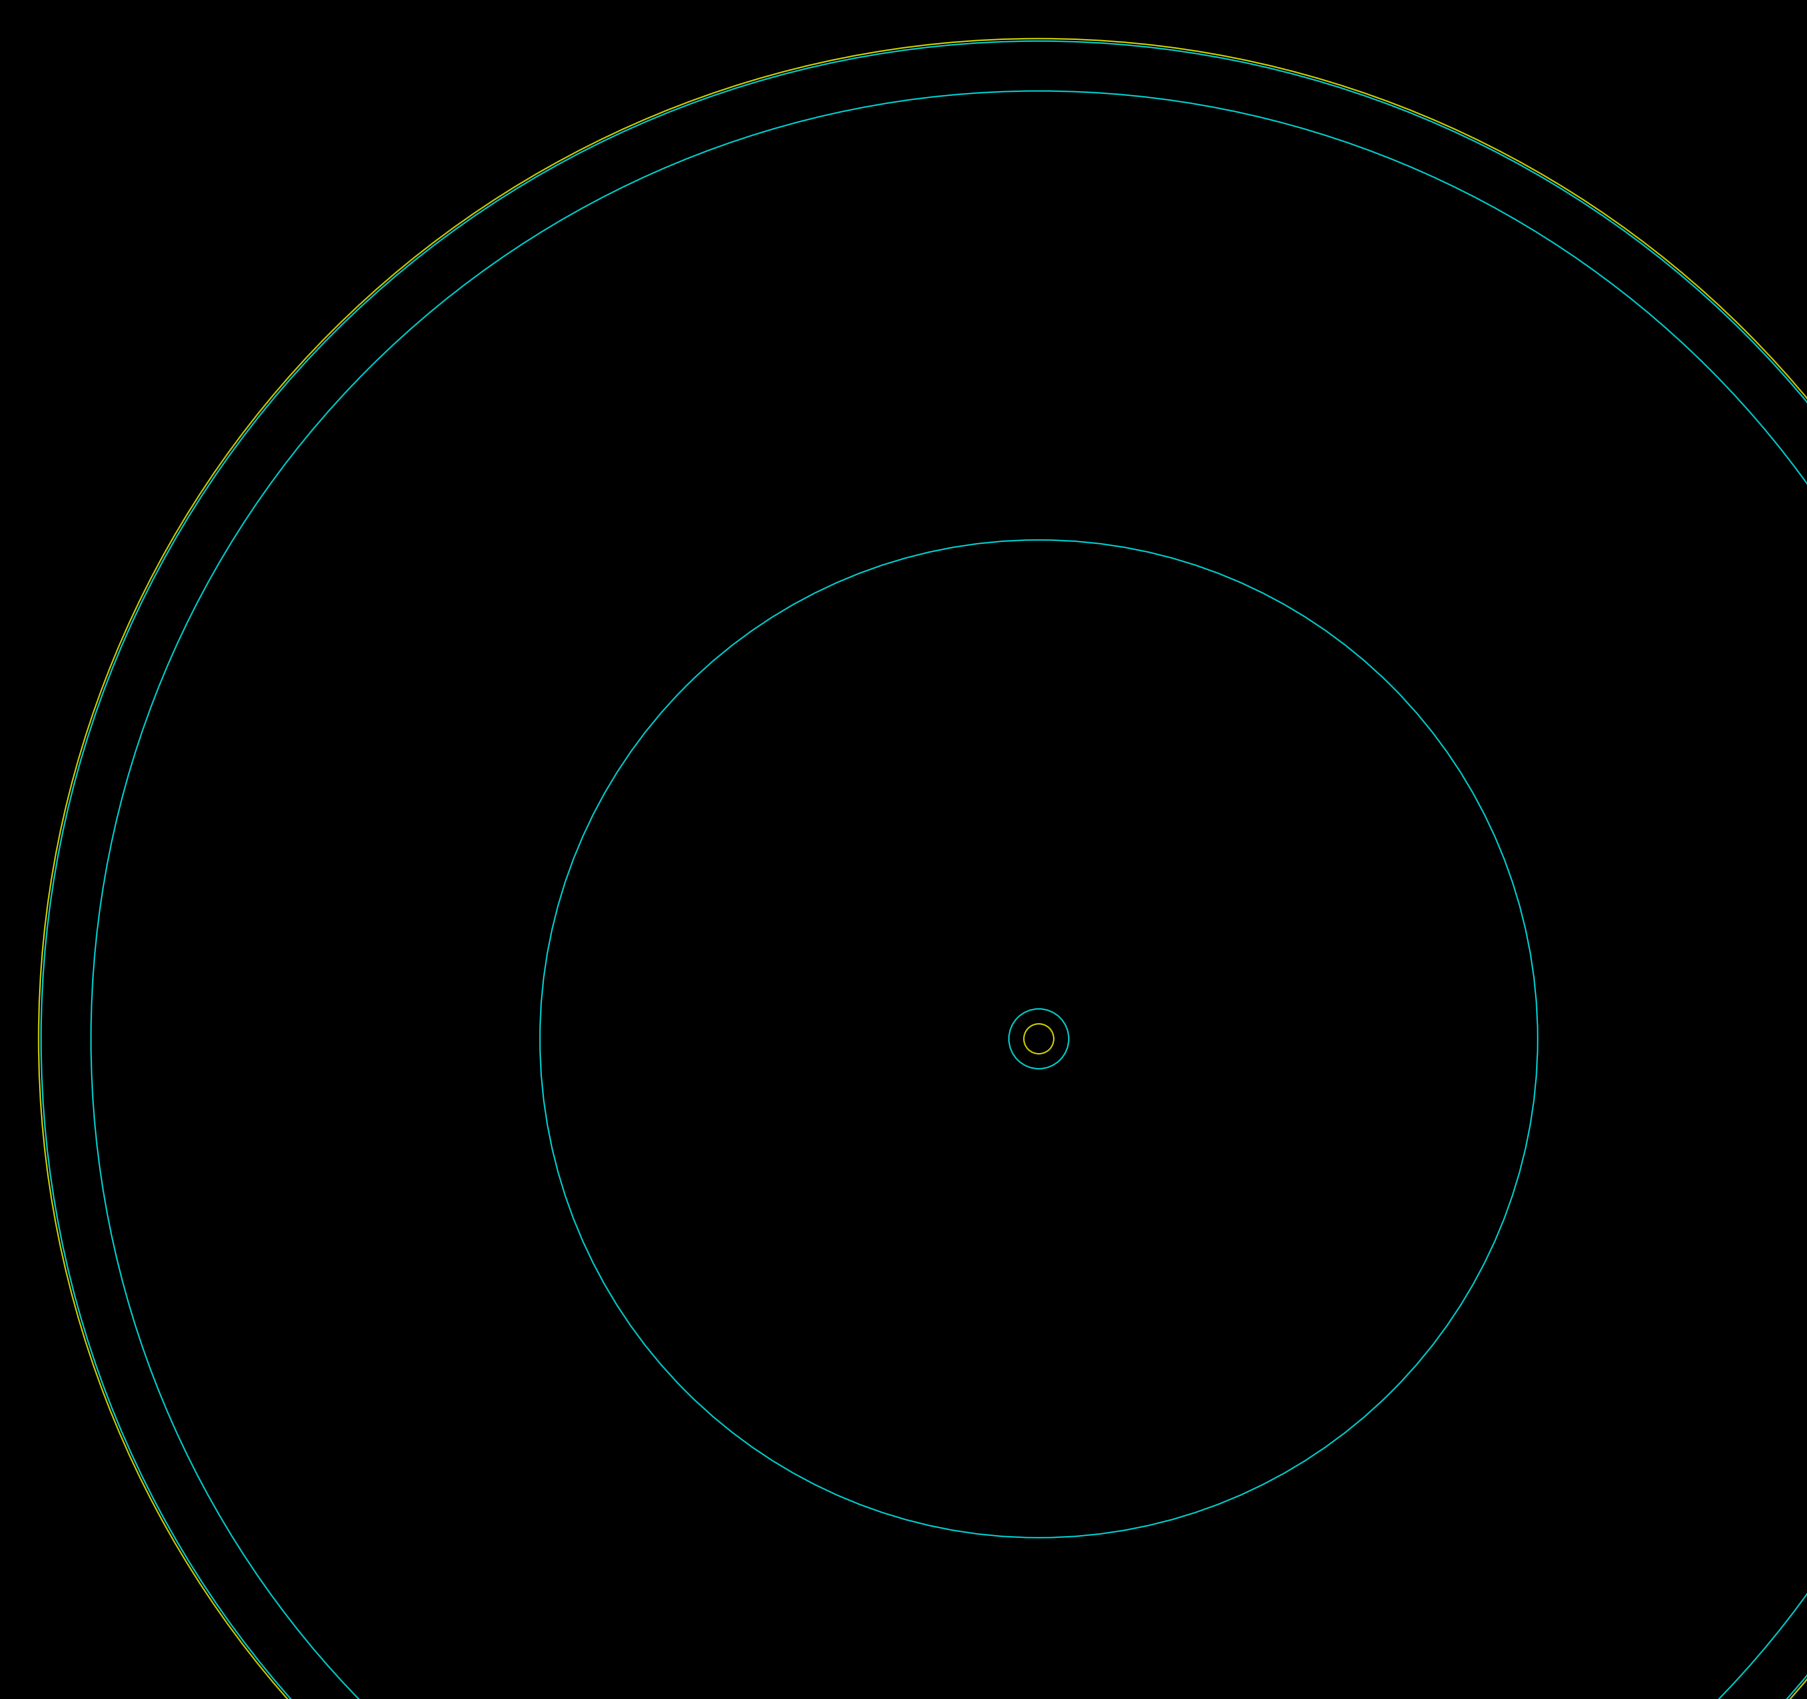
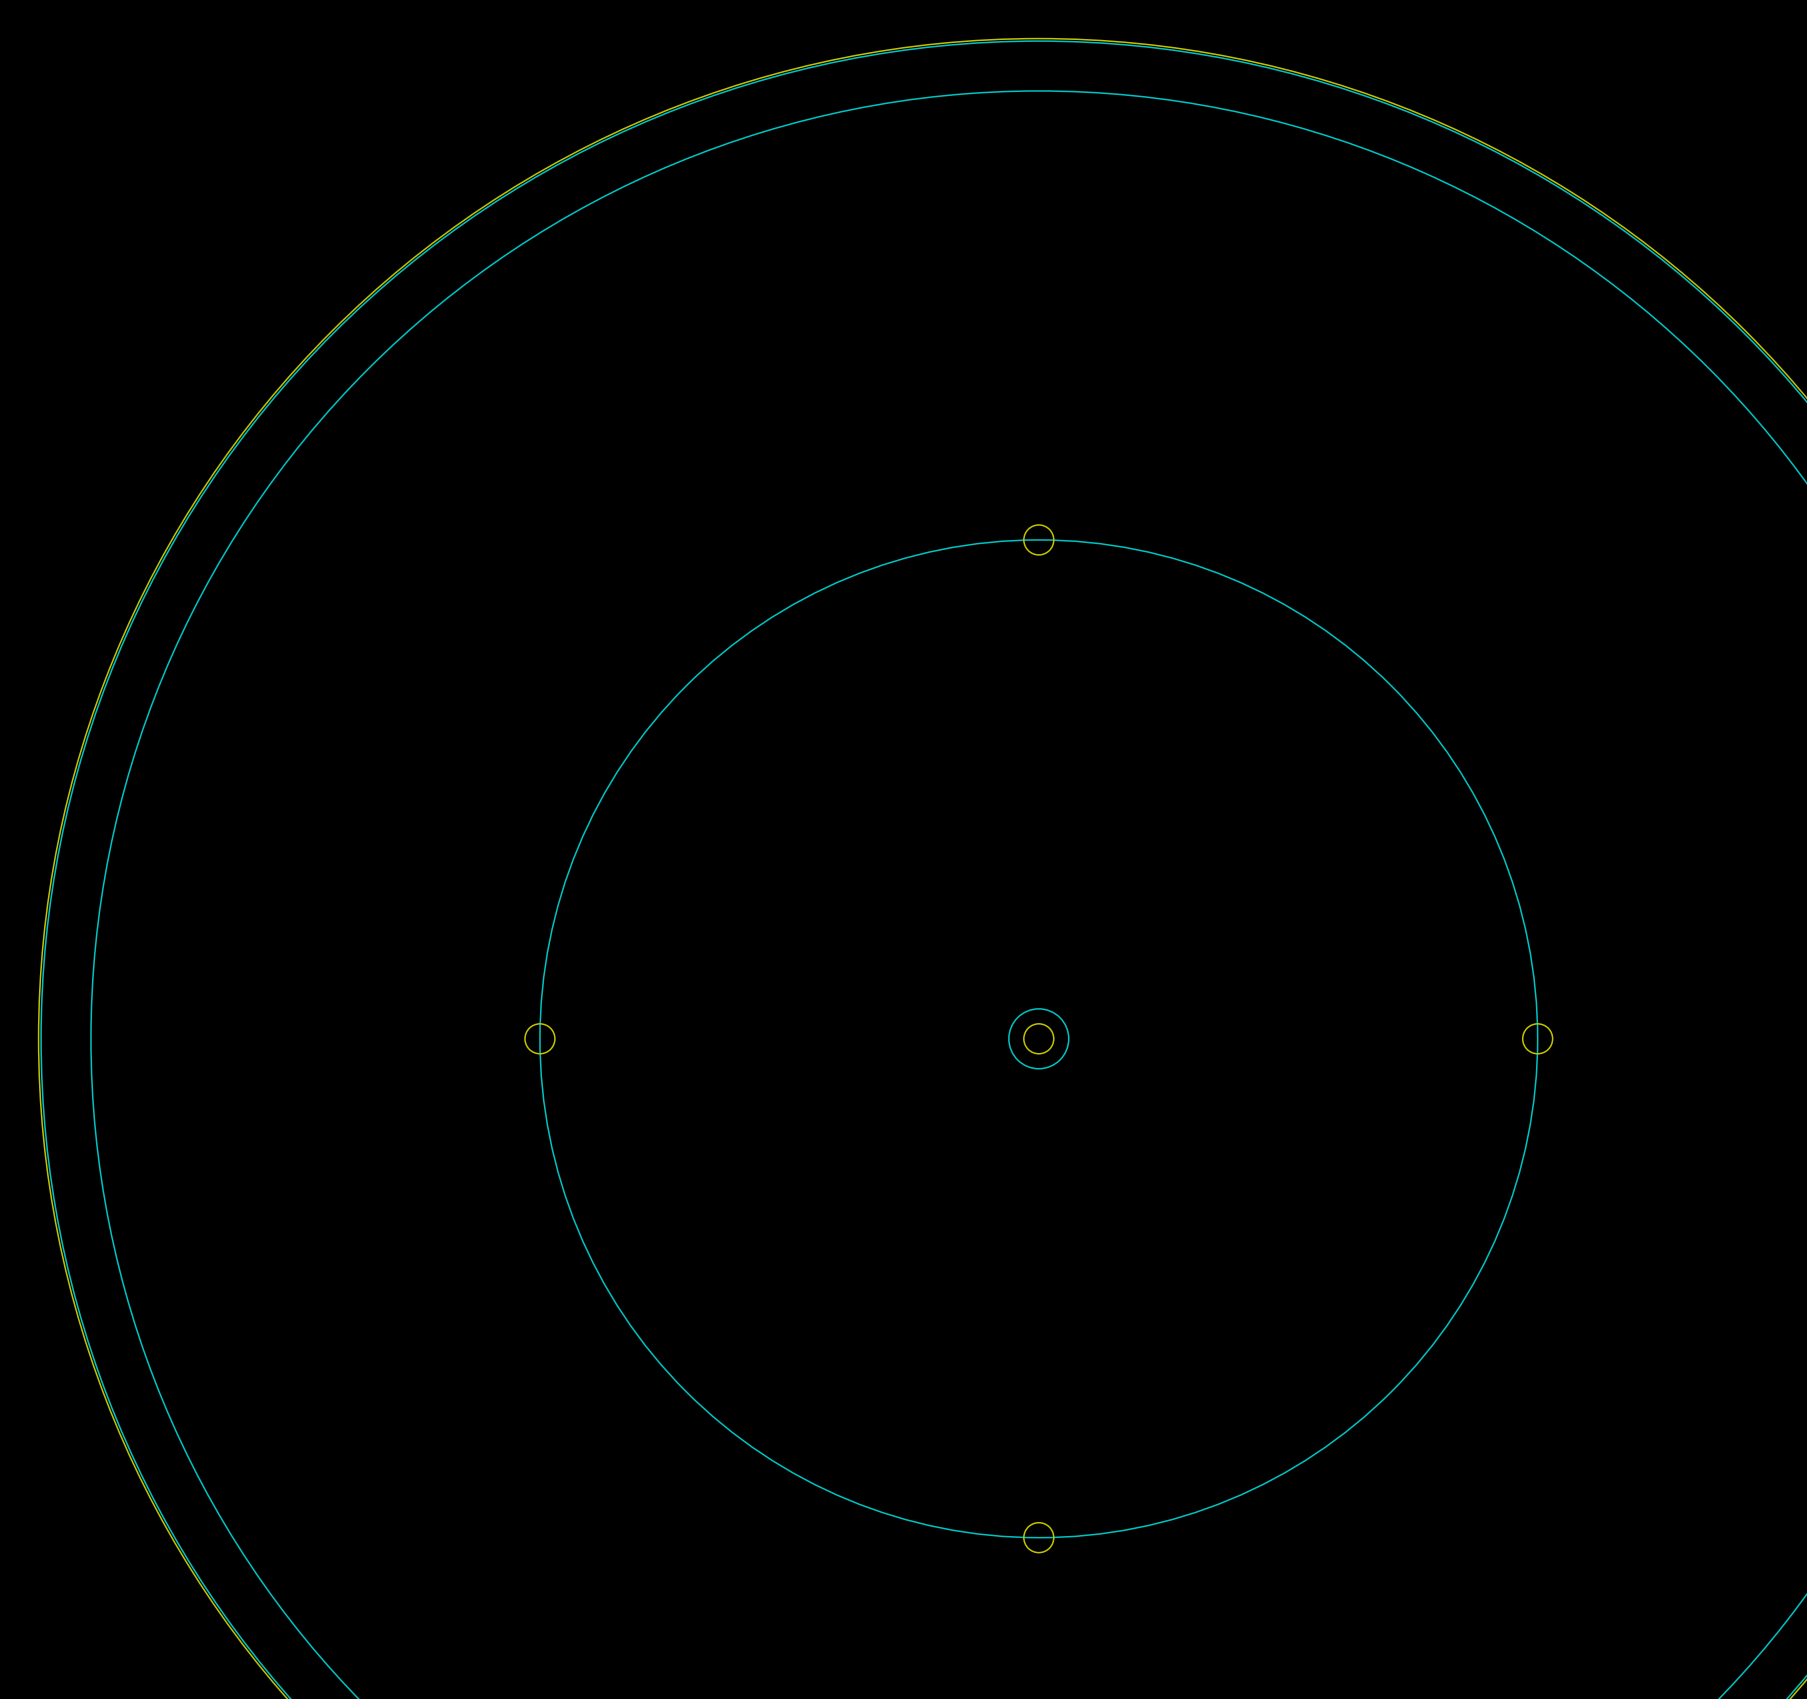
round board edge: none -> [1023, 524, 1055, 556]
round board edge: none -> [524, 1023, 556, 1055]
round board edge: none -> [1522, 1023, 1553, 1055]
round board edge: none -> [1023, 1522, 1055, 1553]

